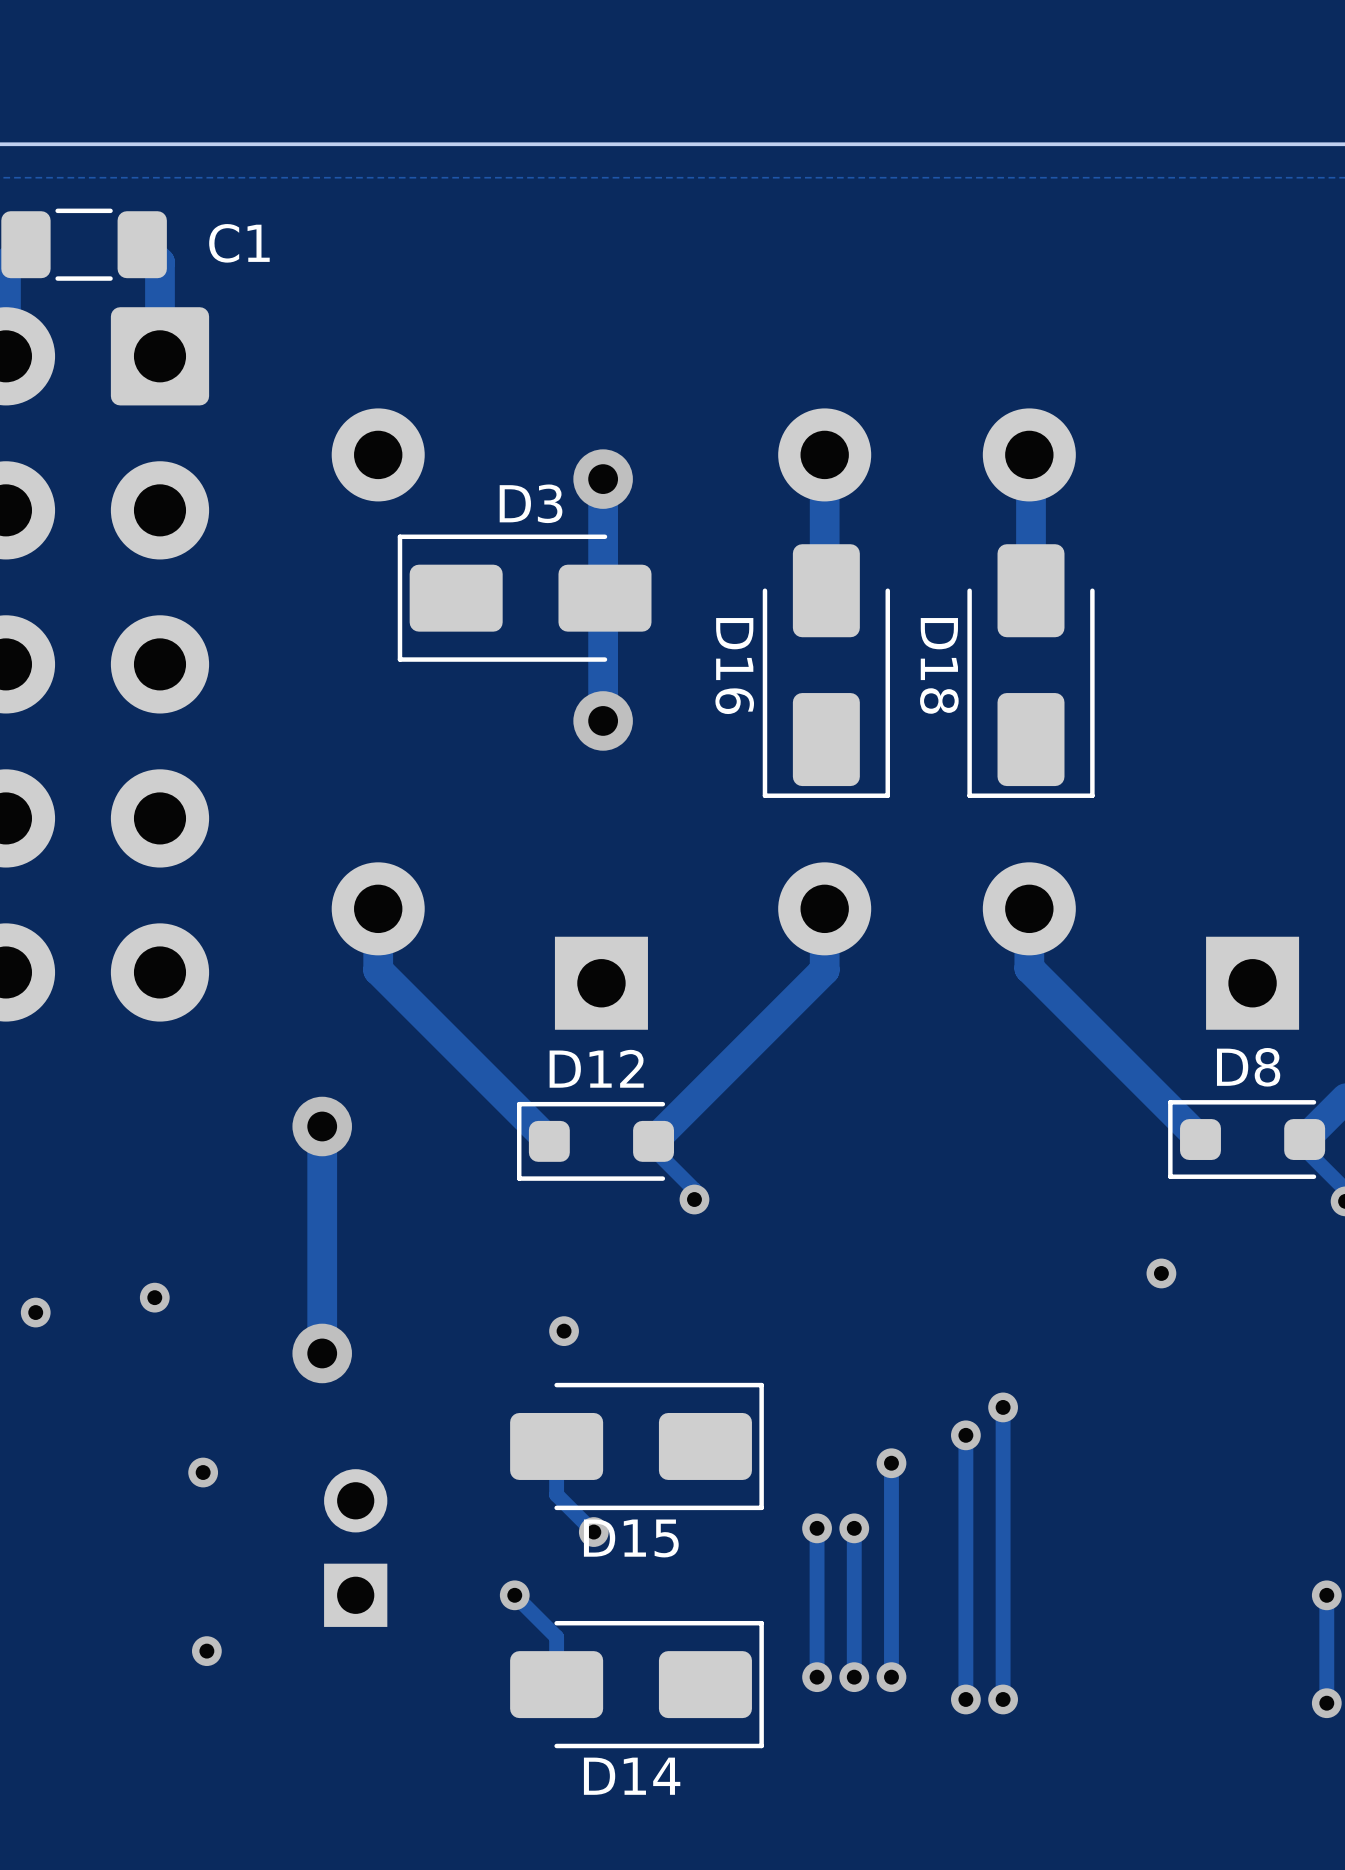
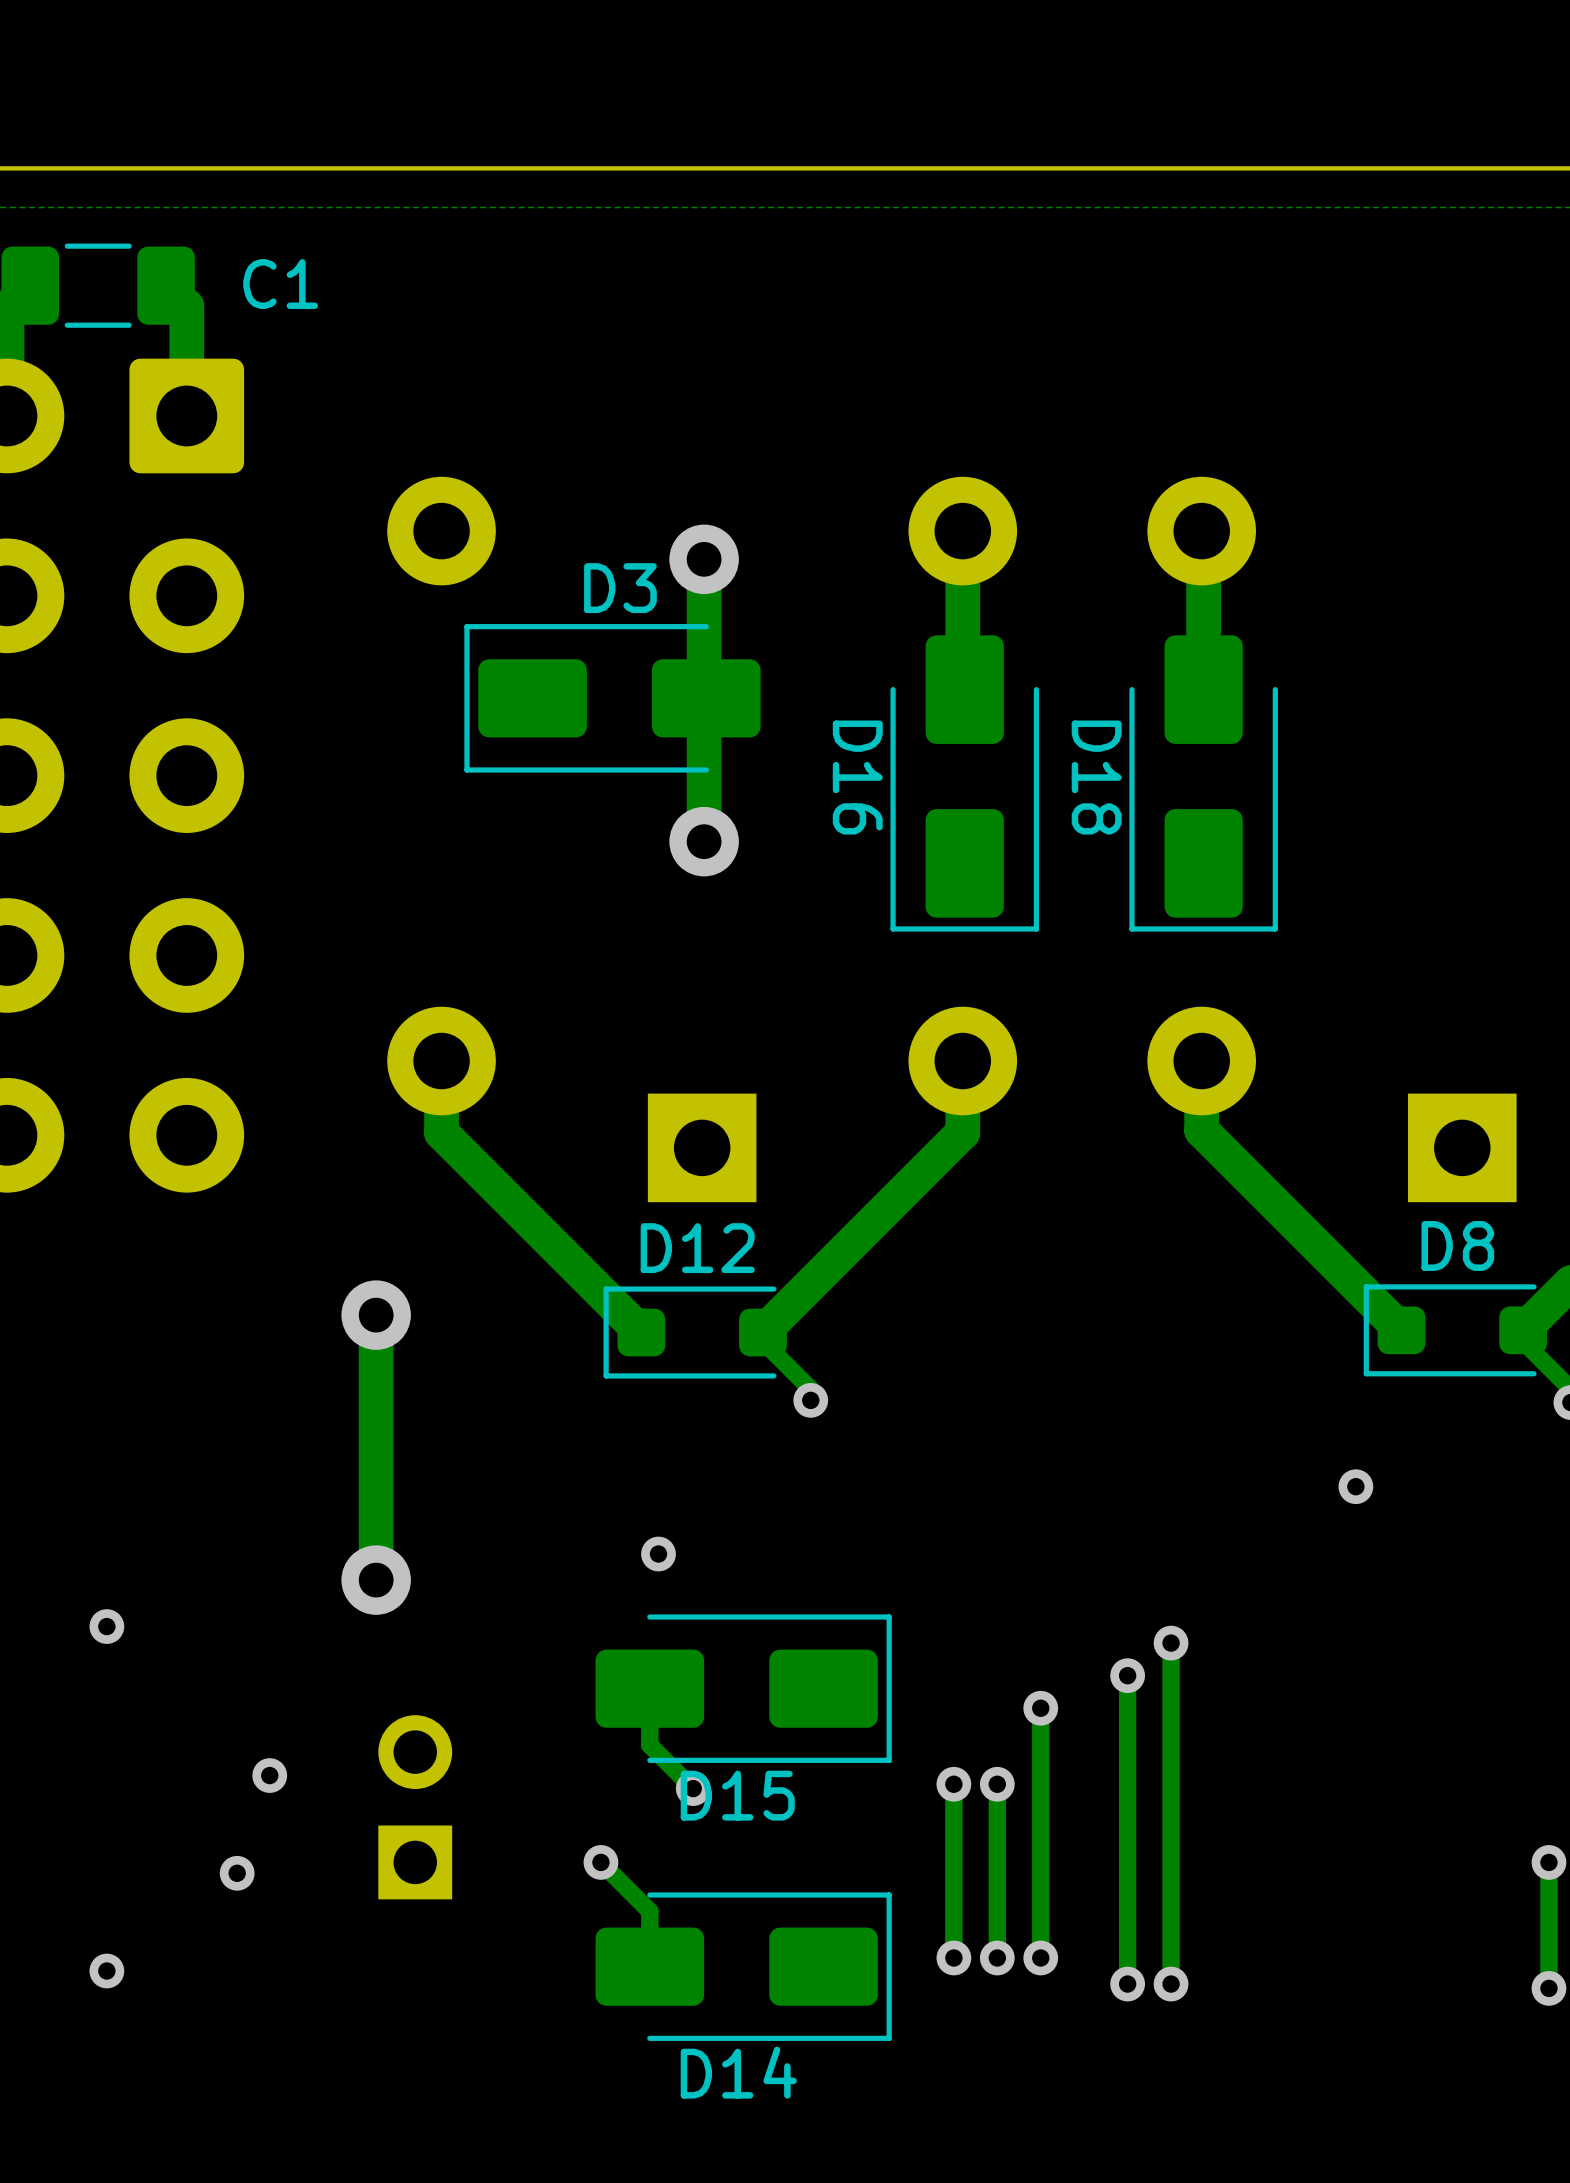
via: (154, 1297) -> none
via: (35, 1312) -> none
via: none -> (106, 1626)
via position: (203, 1472) -> (269, 1775)
via position: (206, 1651) -> (237, 1873)
via: none -> (106, 1971)

